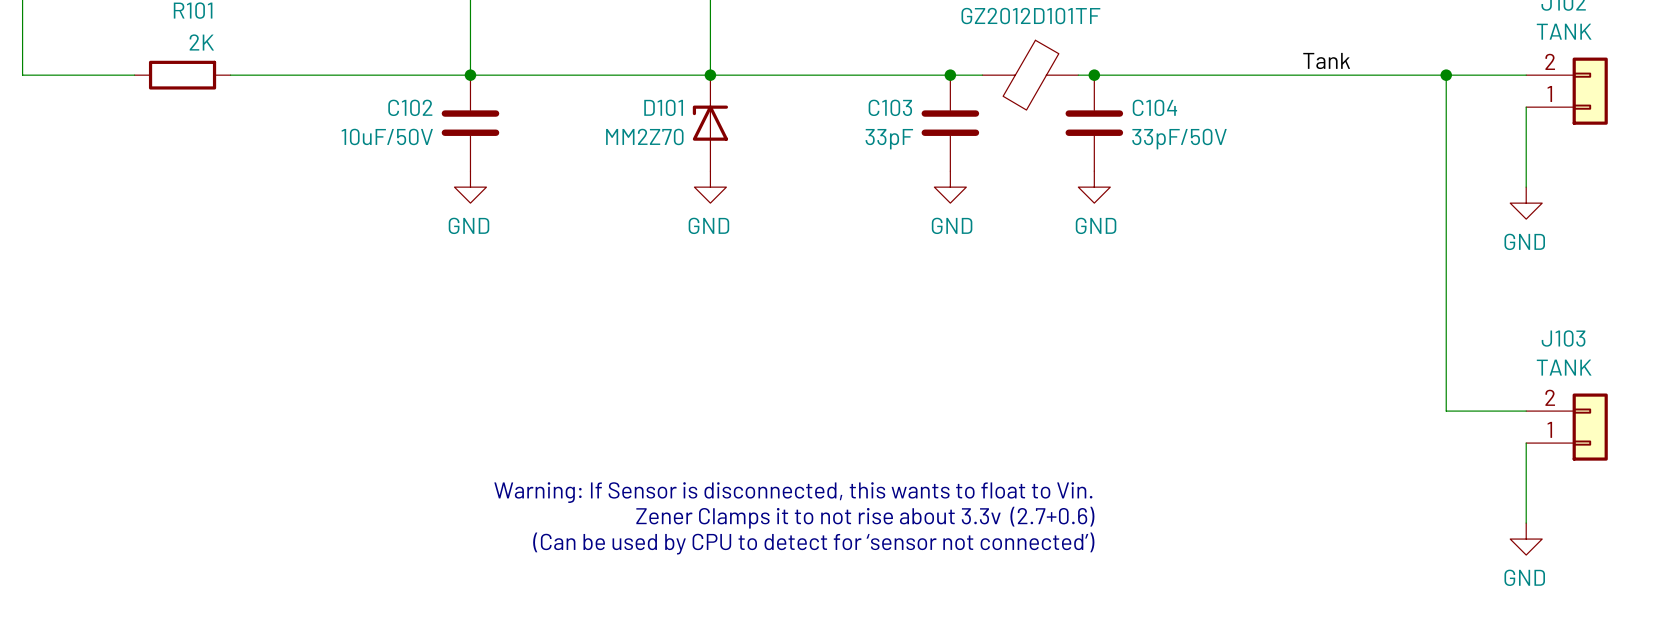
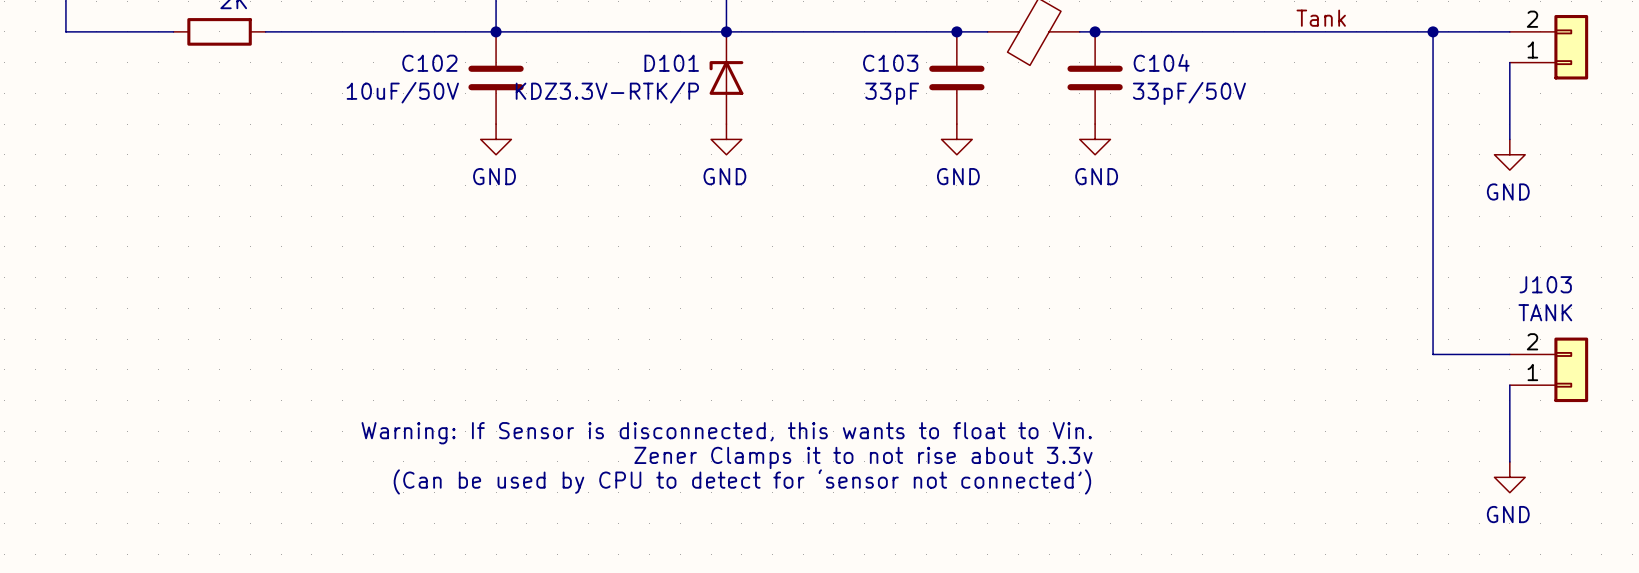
D101 value: MM2Z70 (644, 136) -> KDZ3.3V-RTK/P (607, 92)
text: Zener Clamps it to not rise about 3.3v (2.7+0.6) (865, 517) -> Zener Clamps it to not rise about 3.3v (863, 457)

